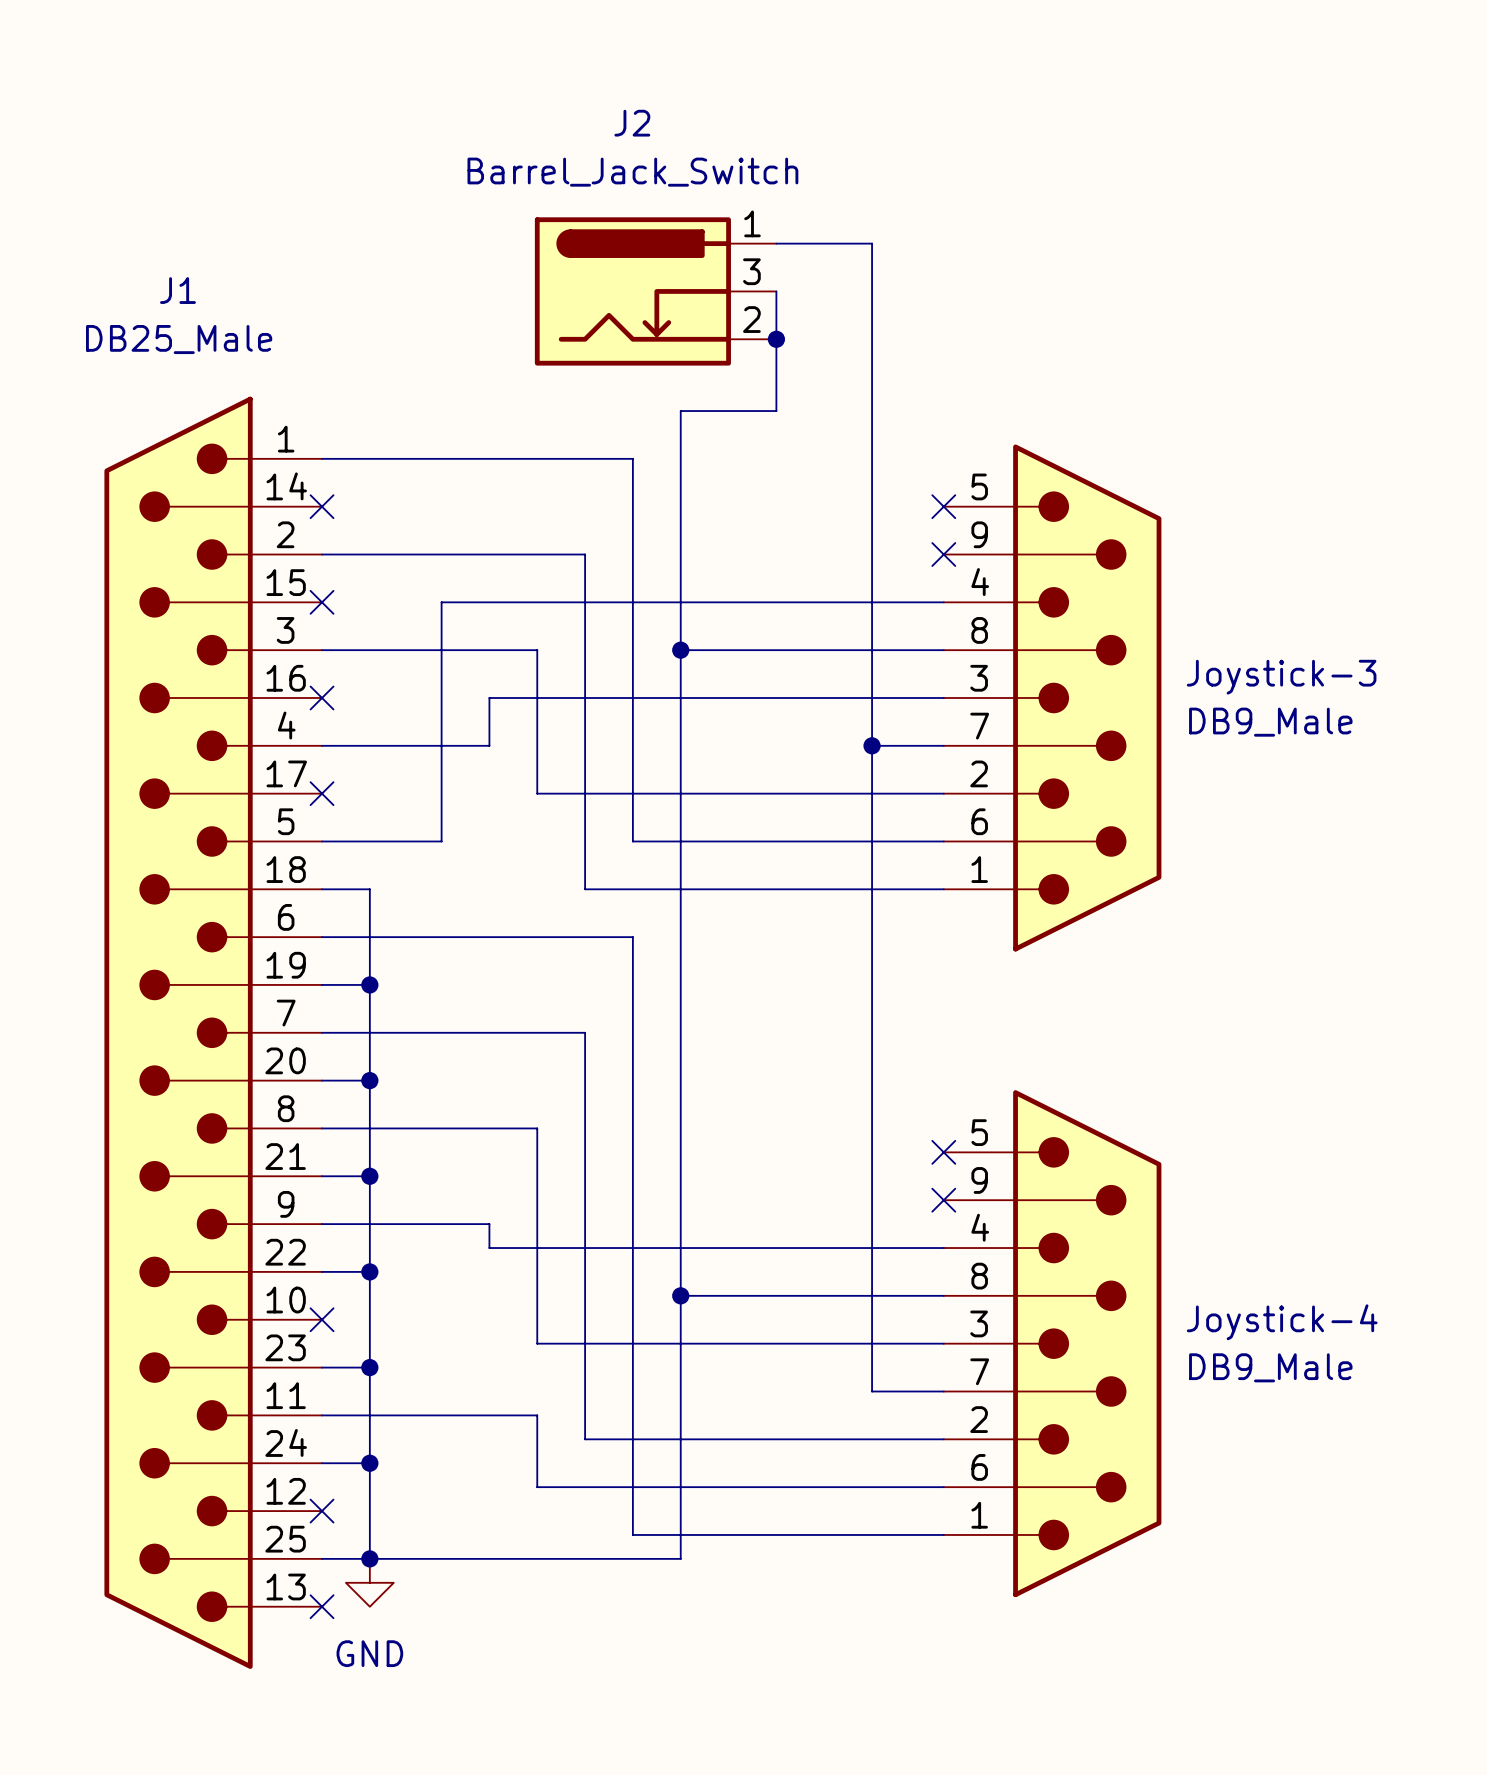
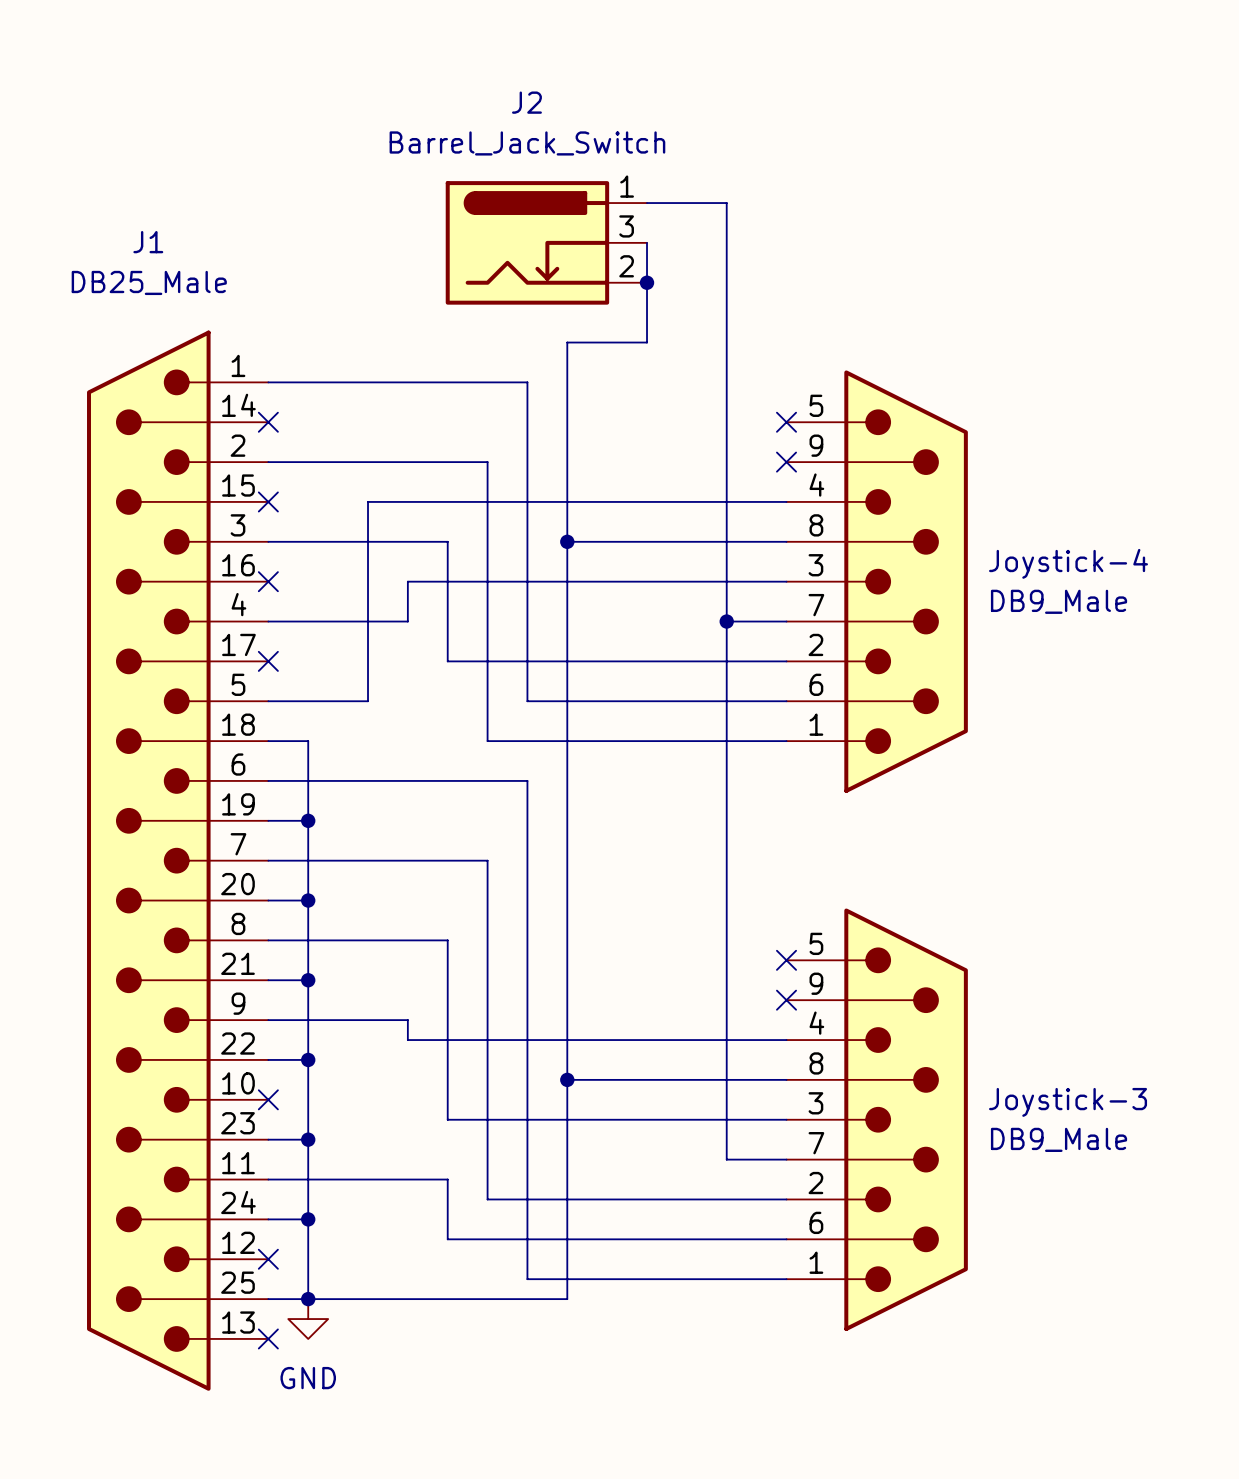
Joystick-3 name: Joystick-3 (1281, 677) -> Joystick-4 (1068, 563)
Joystick-4 name: Joystick-4 (1282, 1322) -> Joystick-3 (1068, 1102)

